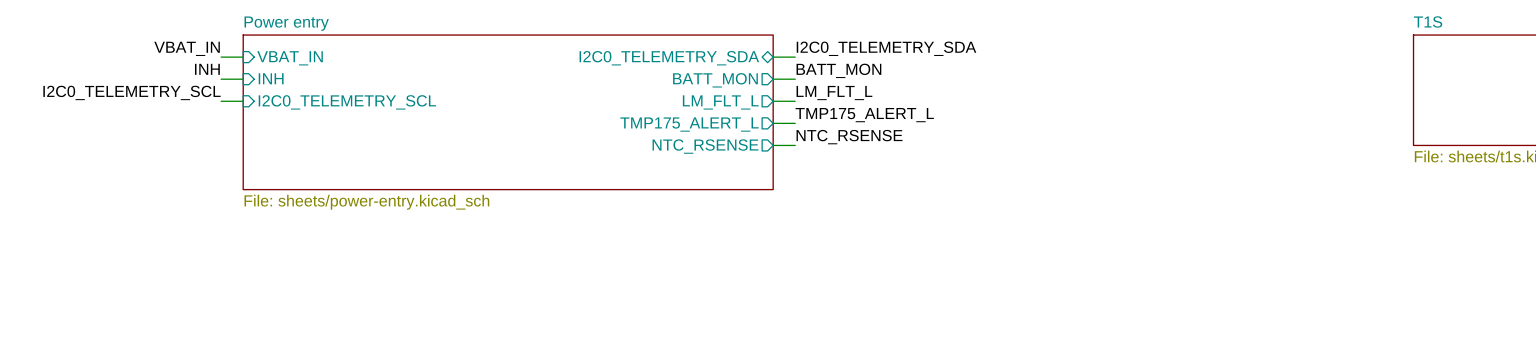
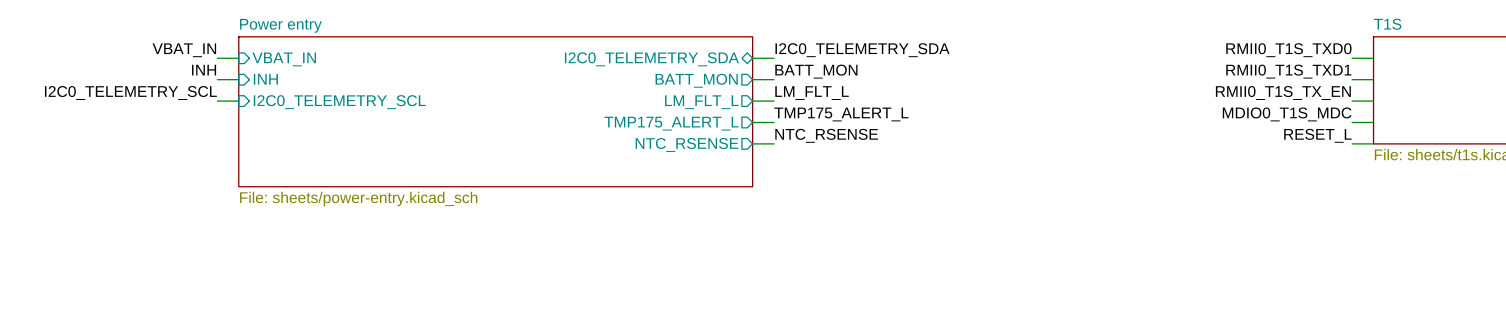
label: none -> RMII0_T1S_TXD0 (1288, 50)
wire: none -> (1352, 58) (1373, 58)
label: none -> RMII0_T1S_TXD1 (1288, 71)
wire: none -> (1352, 79) (1373, 79)
label: none -> RMII0_T1S_TX_EN (1283, 93)
wire: none -> (1352, 101) (1373, 101)
label: none -> MDIO0_T1S_MDC (1287, 114)
wire: none -> (1352, 122) (1373, 122)
label: none -> RESET_L (1317, 135)
wire: none -> (1352, 143) (1373, 143)

